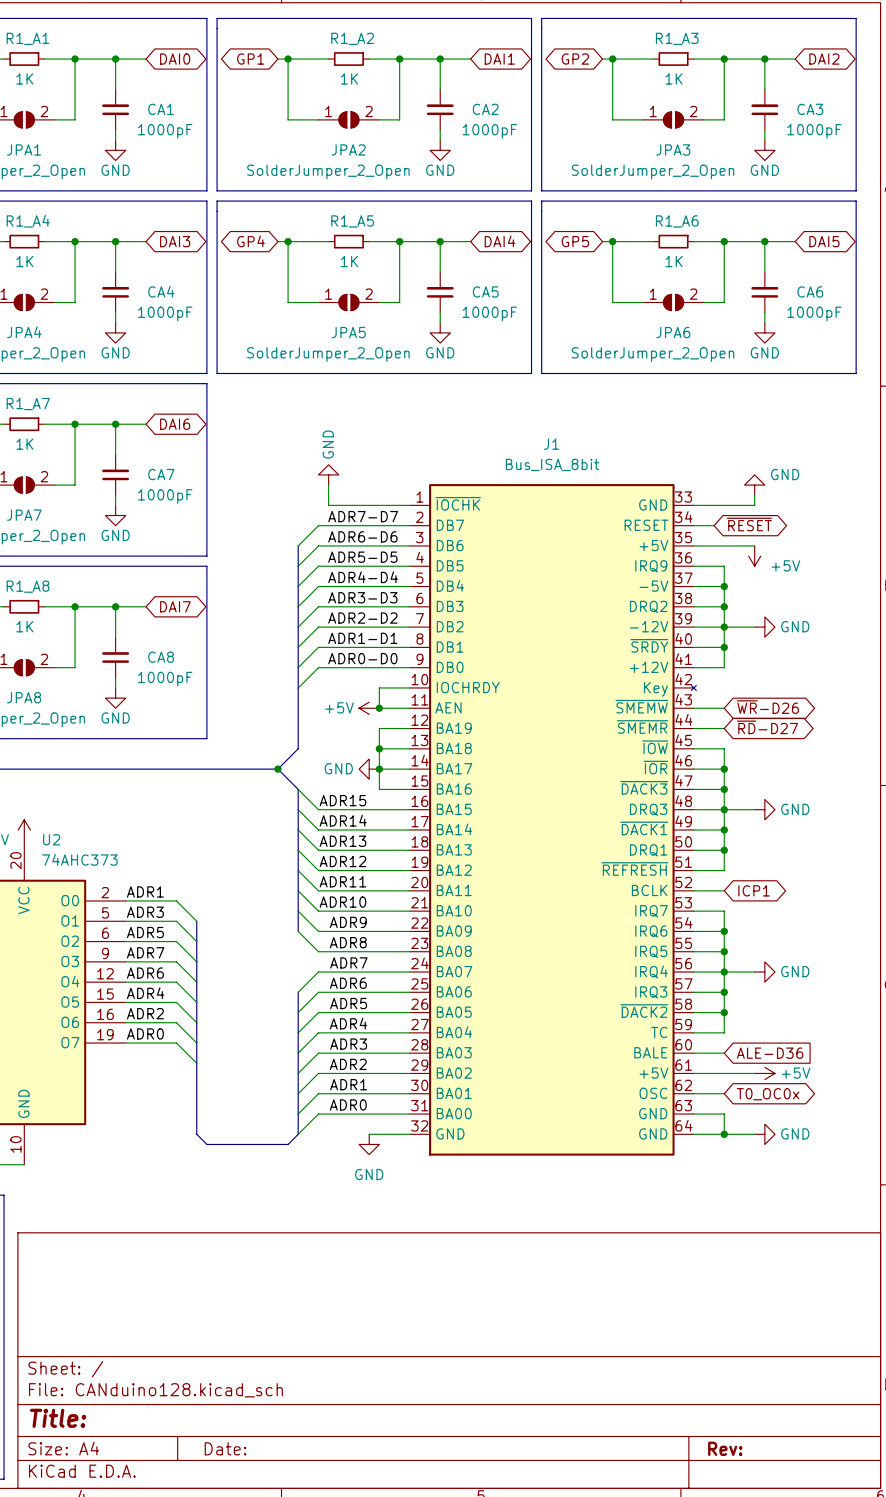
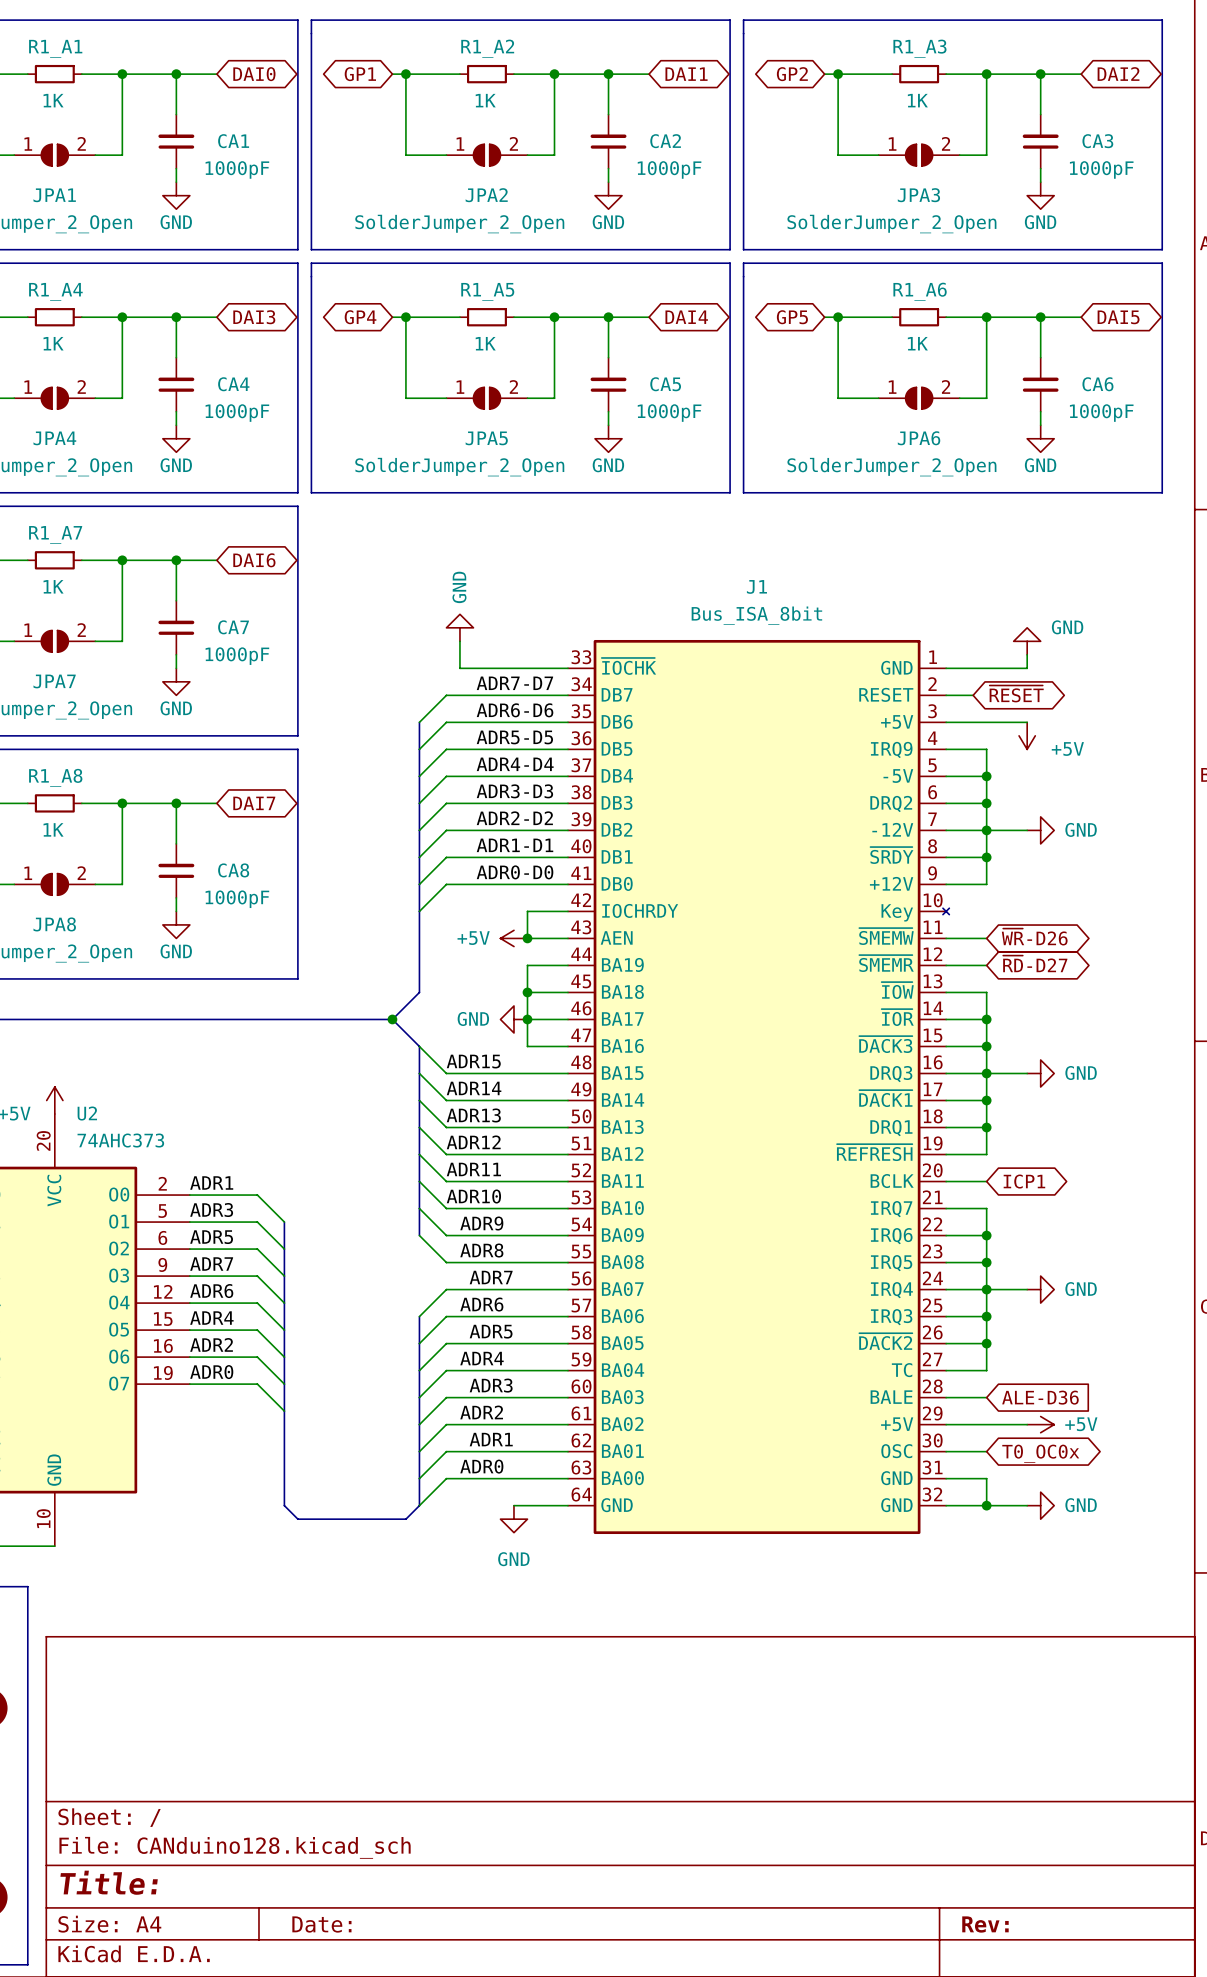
J1 symbol: [409, 484, 697, 1156] -> [568, 639, 950, 1535]

